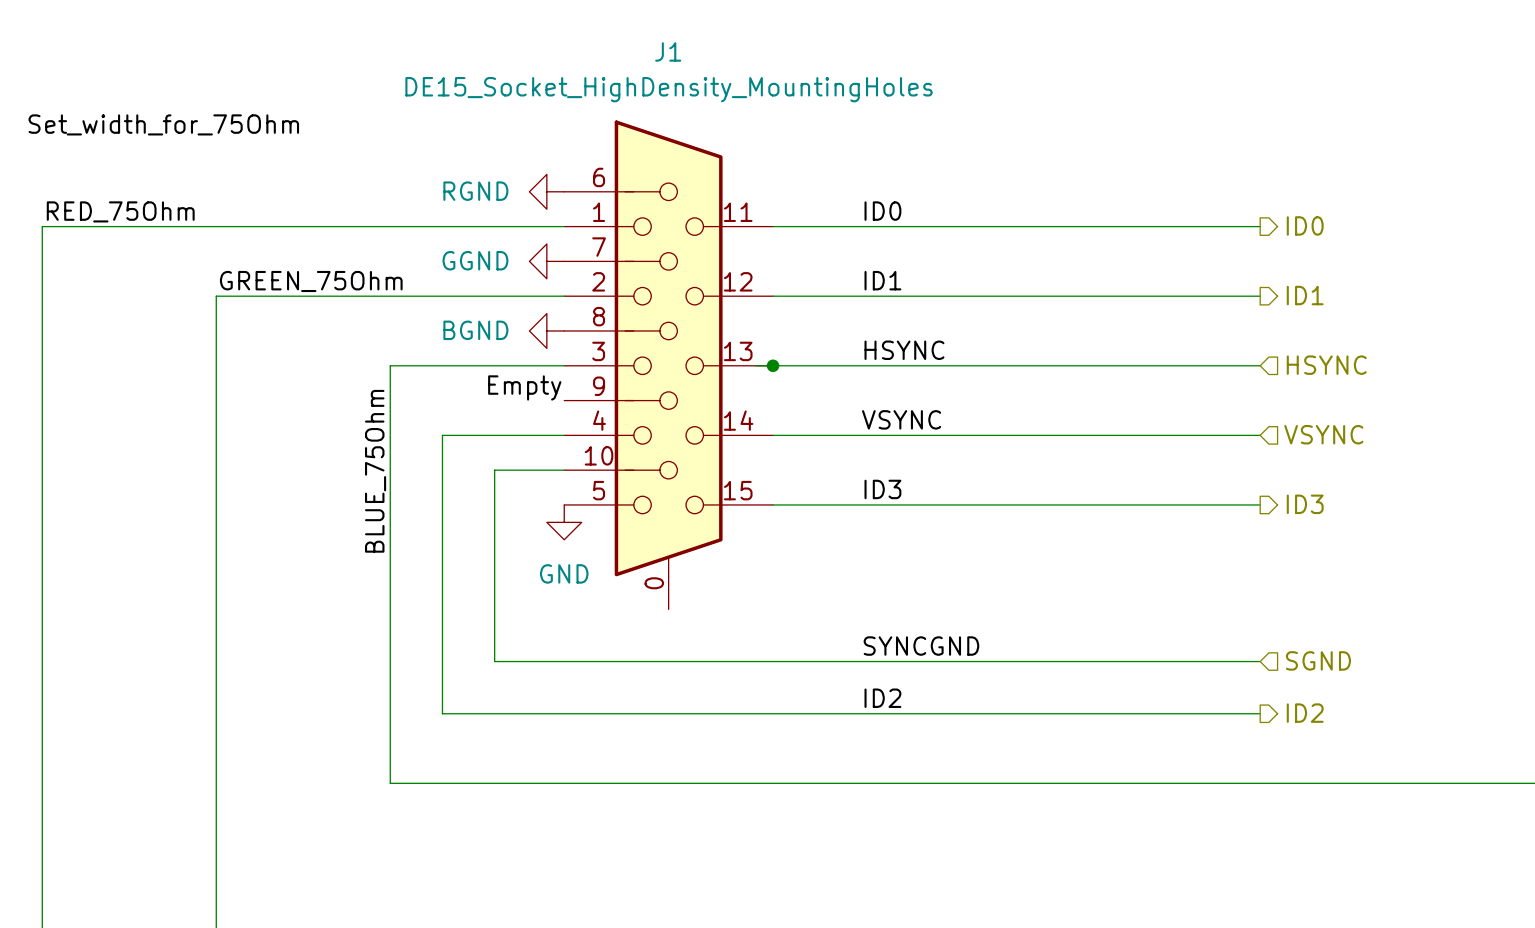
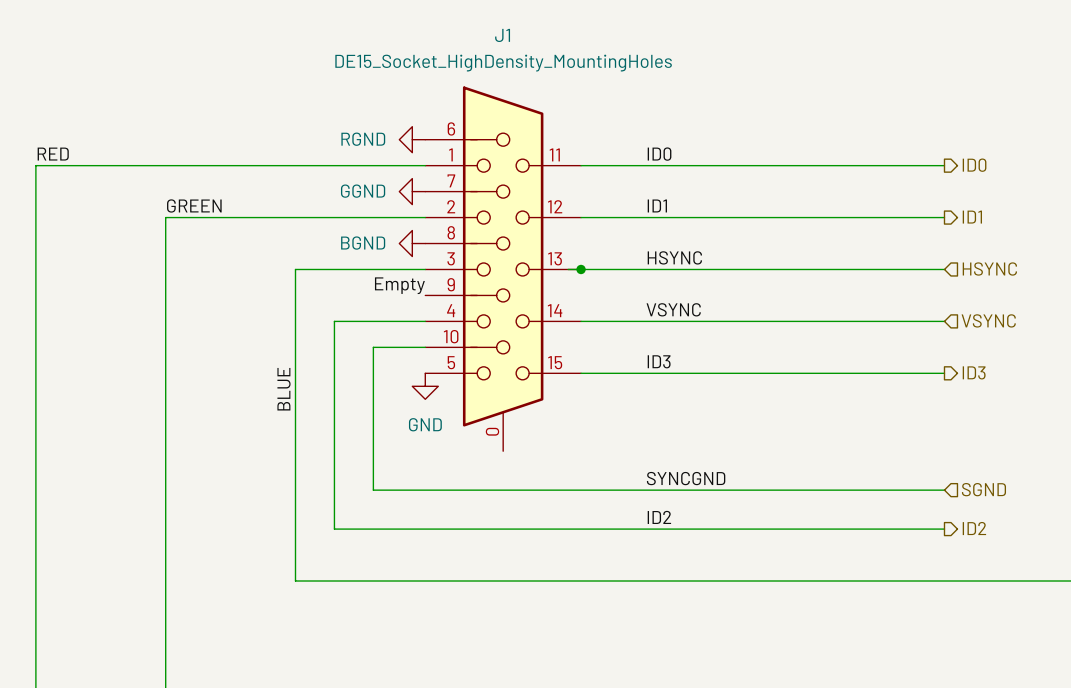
label: Set_width_for_75Ohm (163, 124) -> none
label: RED_75Ohm (120, 211) -> RED (53, 154)
label: GREEN_75Ohm (311, 281) -> GREEN (194, 205)
label: BLUE_75Ohm (375, 471) -> BLUE (283, 389)

